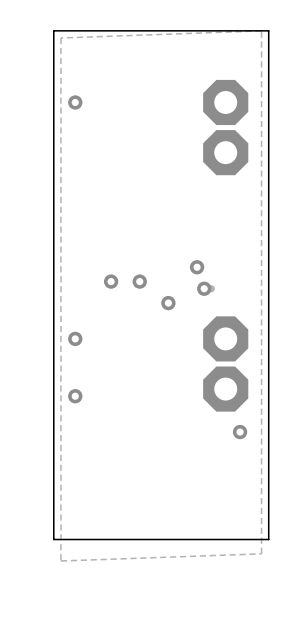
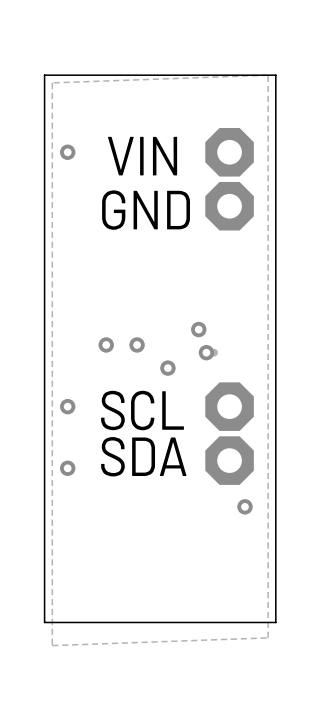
VIN name: none -> VIN (142, 156)
GND name: none -> GND (146, 210)
SCL name: none -> SCL (142, 410)
SDA name: none -> SDA (143, 456)

